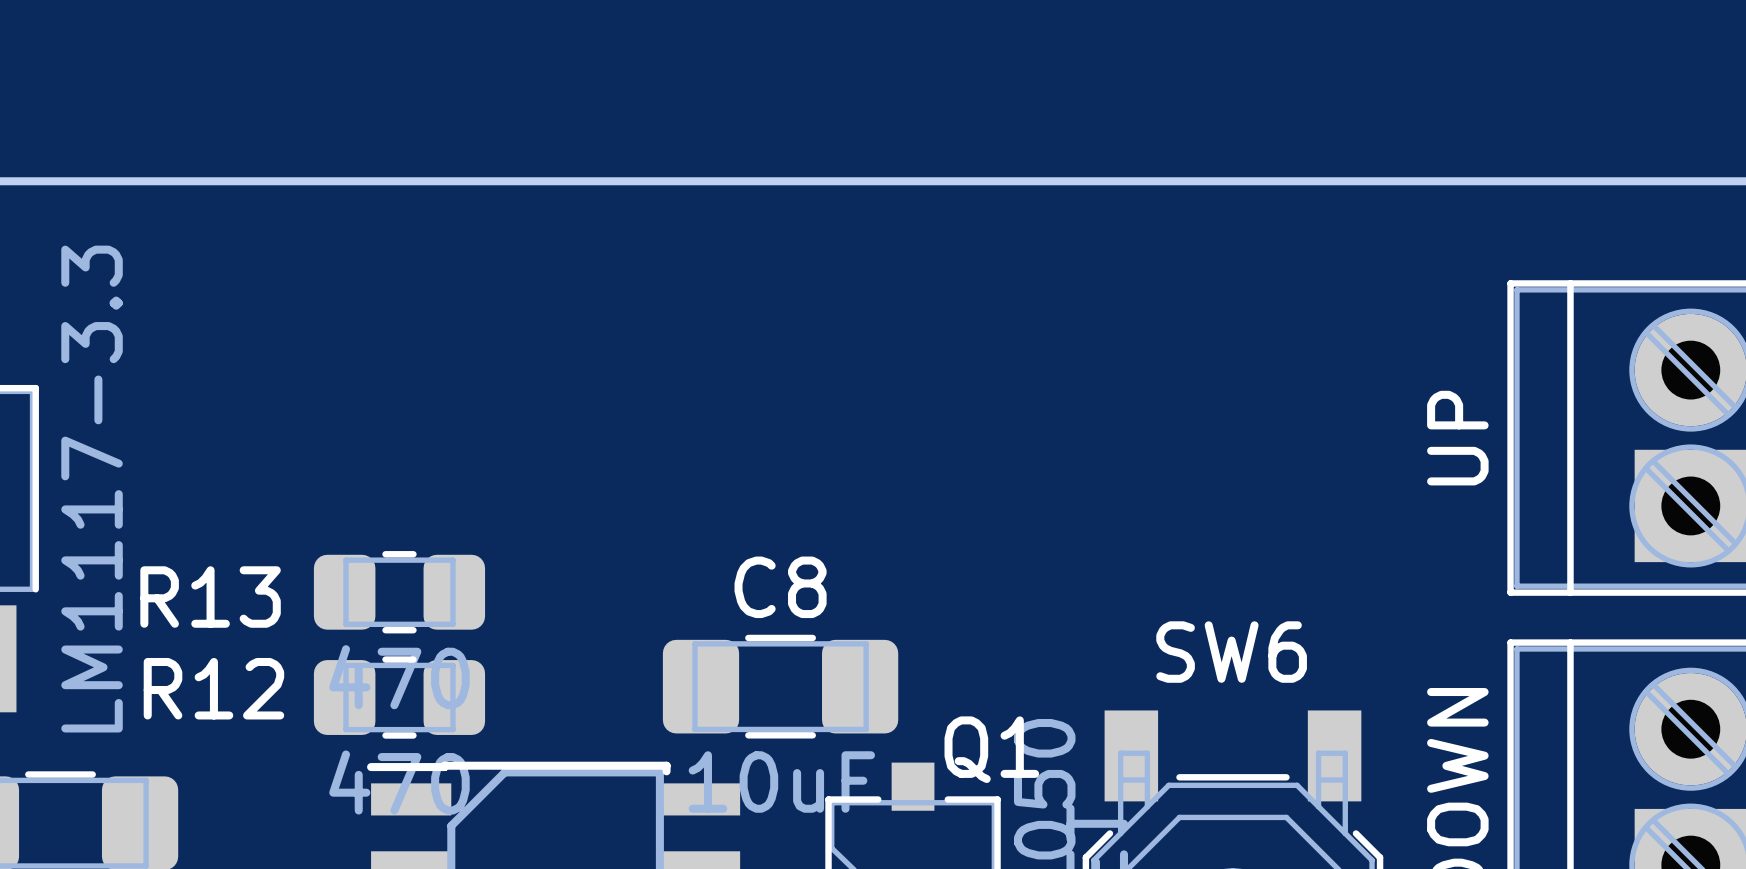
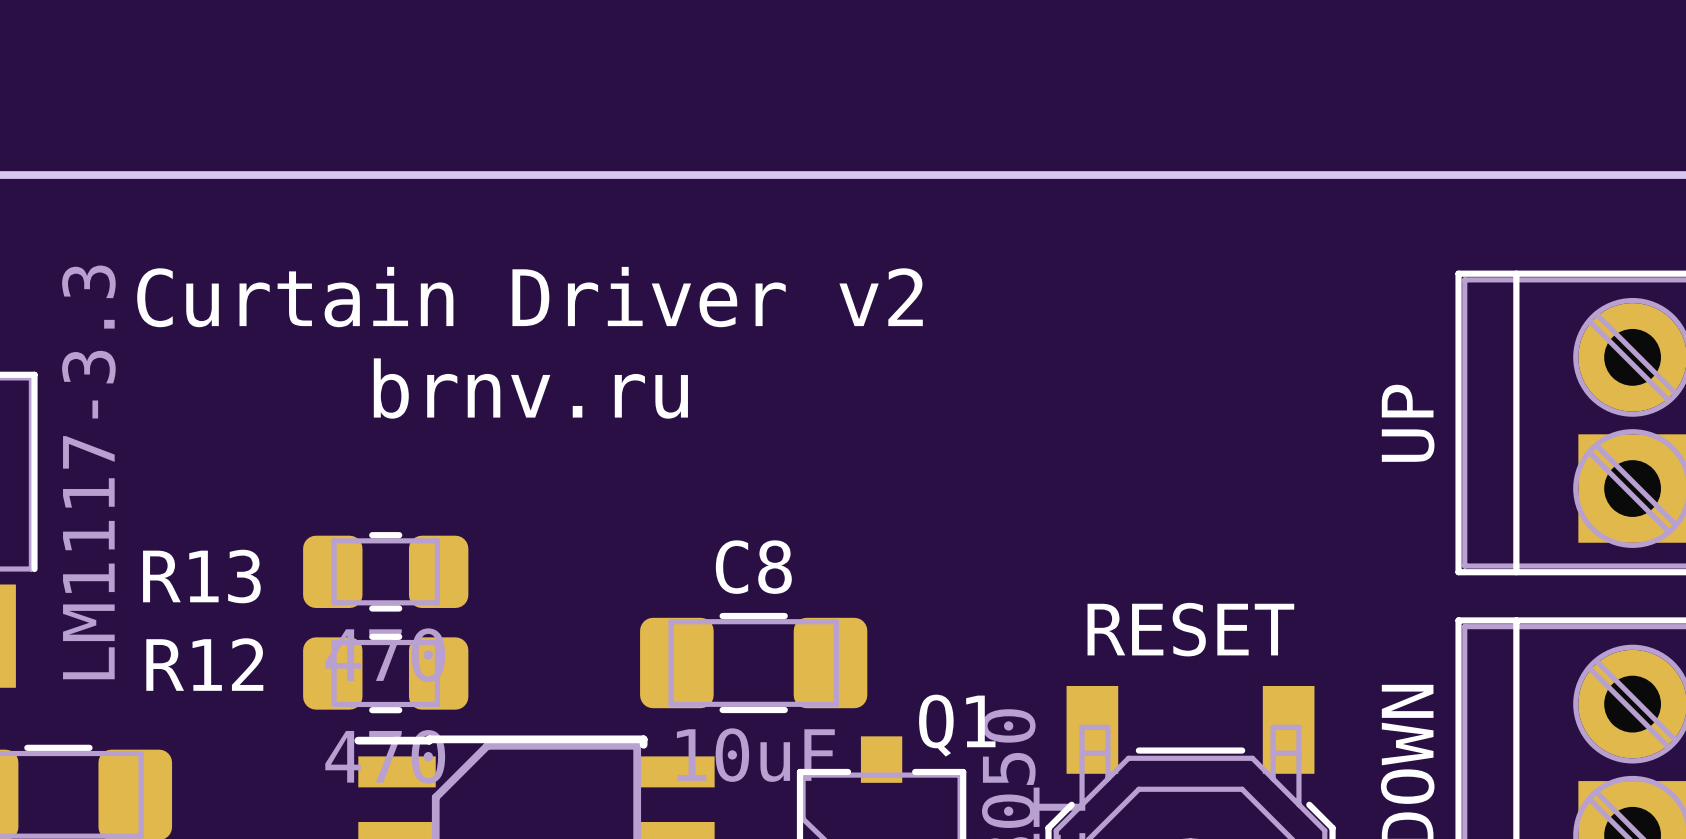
text: none -> Curtain Driver v2 (530, 297)
text: none -> brnv.ru (530, 388)
SW6 name: SW6 (1231, 652) -> RESET (1190, 629)

